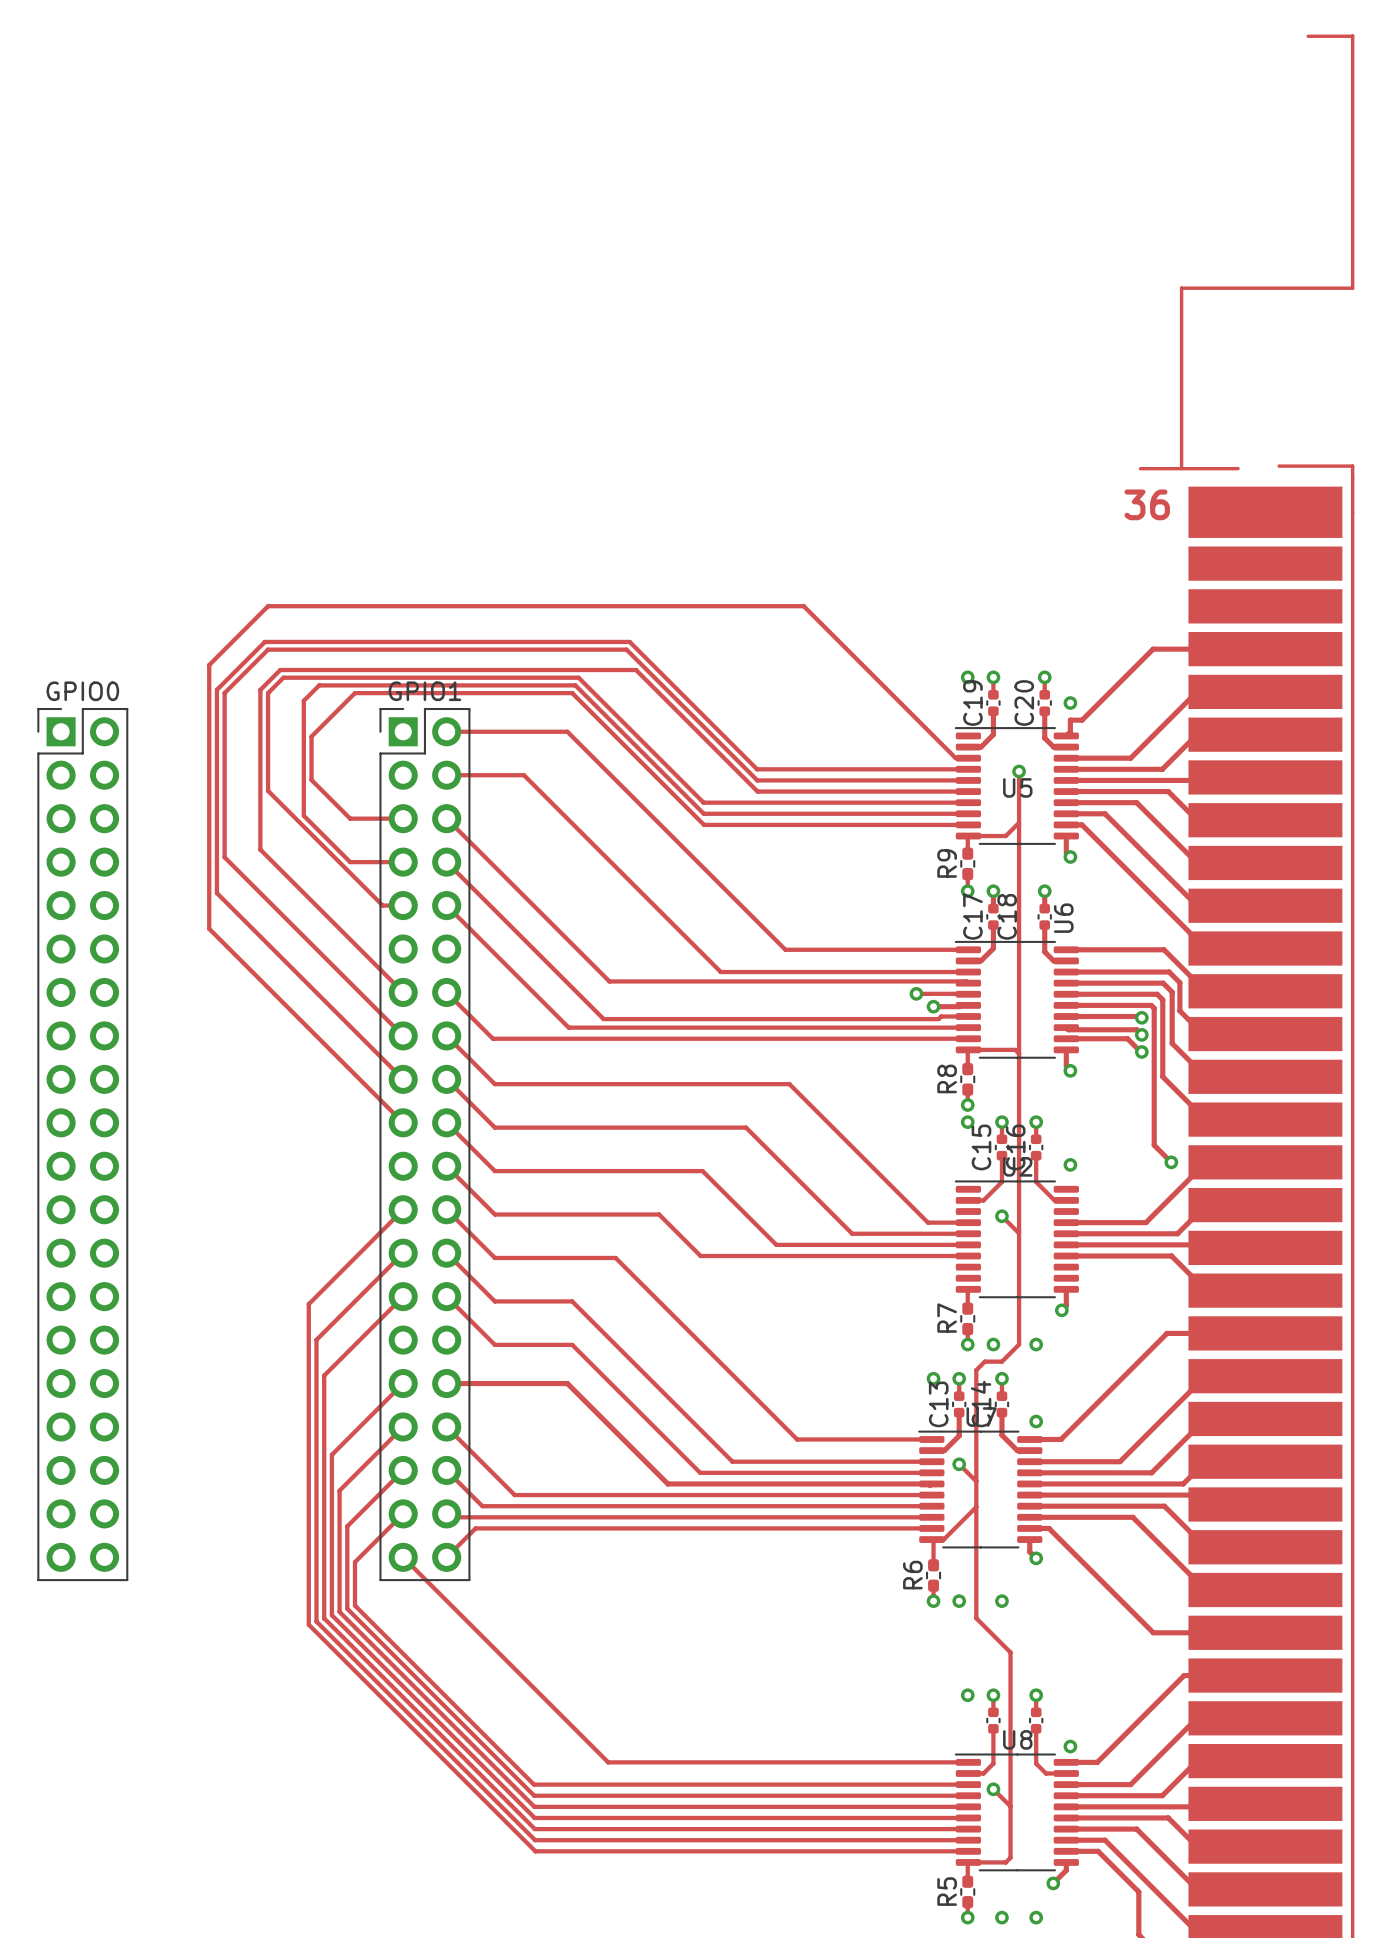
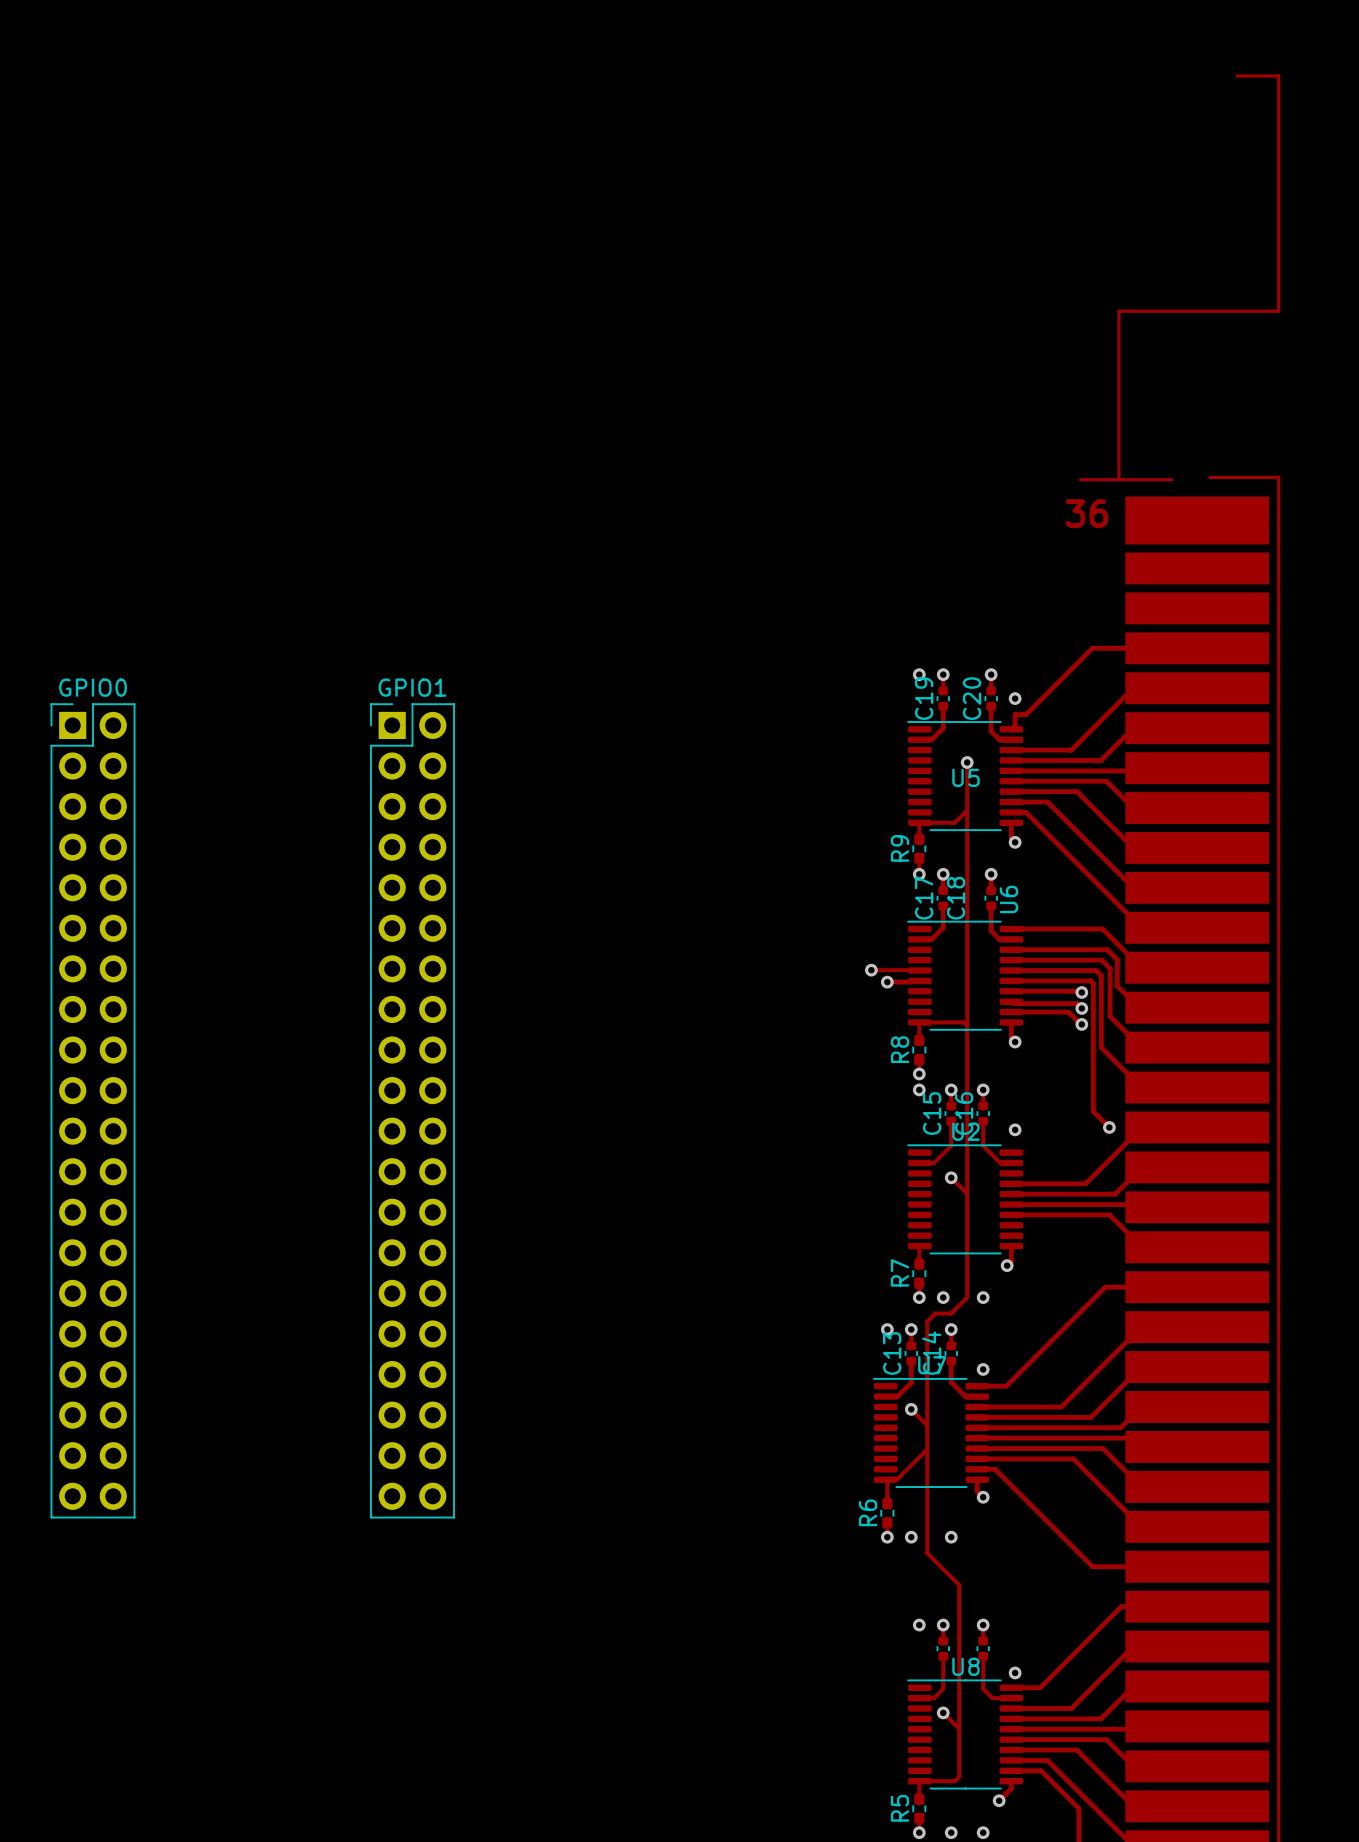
track: (446, 731) (567, 731) (785, 949) (968, 949) -> none
track: (968, 758) (955, 758) (803, 606) (268, 606) (209, 665) (209, 928) (403, 1122) -> none
track: (968, 769) (757, 769) (629, 641) (264, 641) (216, 689) (216, 893) (403, 1079) -> none
track: (446, 775) (524, 775) (720, 972) (968, 972) -> none
track: (968, 780) (757, 780) (626, 649) (268, 649) (224, 693) (224, 857) (403, 1035) -> none
track: (968, 791) (757, 791) (636, 670) (280, 670) (260, 689) (260, 849) (403, 992) -> none
track: (968, 802) (703, 802) (578, 677) (283, 677) (268, 693) (268, 790) (382, 905) (403, 905) -> none
track: (968, 813) (703, 813) (575, 685) (319, 685) (303, 700) (303, 815) (350, 862) (403, 862) -> none
track: (403, 818) (350, 818) (311, 780) (311, 736) (354, 693) (572, 693) (704, 824) (968, 824) -> none
track: (446, 818) (609, 981) (966, 981) (968, 983) -> none
track: (446, 862) (603, 1019) (938, 1019) (941, 1016) (968, 1016) -> none
track: (446, 905) (568, 1027) (968, 1027) -> none
track: (446, 992) (492, 1038) (968, 1038) -> none
track: (446, 1035) (494, 1084) (789, 1084) (927, 1222) (968, 1222) -> none
track: (446, 1079) (494, 1127) (746, 1127) (852, 1233) (968, 1233) -> none
track: (446, 1122) (494, 1171) (702, 1171) (776, 1244) (968, 1244) -> none
track: (446, 1166) (494, 1214) (659, 1214) (700, 1256) (968, 1256) -> none
track: (403, 1209) (308, 1304) (308, 1624) (535, 1851) (968, 1851) -> none
track: (446, 1209) (494, 1257) (615, 1257) (797, 1439) (931, 1439) -> none
track: (403, 1253) (316, 1339) (316, 1621) (535, 1840) (968, 1840) -> none
track: (446, 1253) (494, 1301) (572, 1301) (732, 1461) (931, 1461) -> none
track: (403, 1296) (324, 1375) (324, 1618) (534, 1829) (968, 1829) -> none
track: (446, 1296) (494, 1344) (572, 1344) (700, 1472) (931, 1472) -> none
track: (403, 1383) (331, 1454) (331, 1615) (534, 1817) (968, 1817) -> none
track: (446, 1383) (567, 1383) (667, 1483) (931, 1483) -> none
track: (403, 1426) (339, 1490) (339, 1611) (534, 1806) (968, 1806) -> none
track: (446, 1426) (514, 1495) (931, 1495) -> none
track: (403, 1470) (347, 1526) (347, 1608) (534, 1795) (968, 1795) -> none
track: (446, 1470) (482, 1506) (931, 1506) -> none
track: (403, 1513) (354, 1562) (354, 1605) (534, 1784) (968, 1784) -> none
track: (446, 1513) (450, 1517) (931, 1517) -> none
track: (931, 1528) (475, 1528) (446, 1557) -> none
track: (403, 1557) (608, 1762) (968, 1762) -> none

